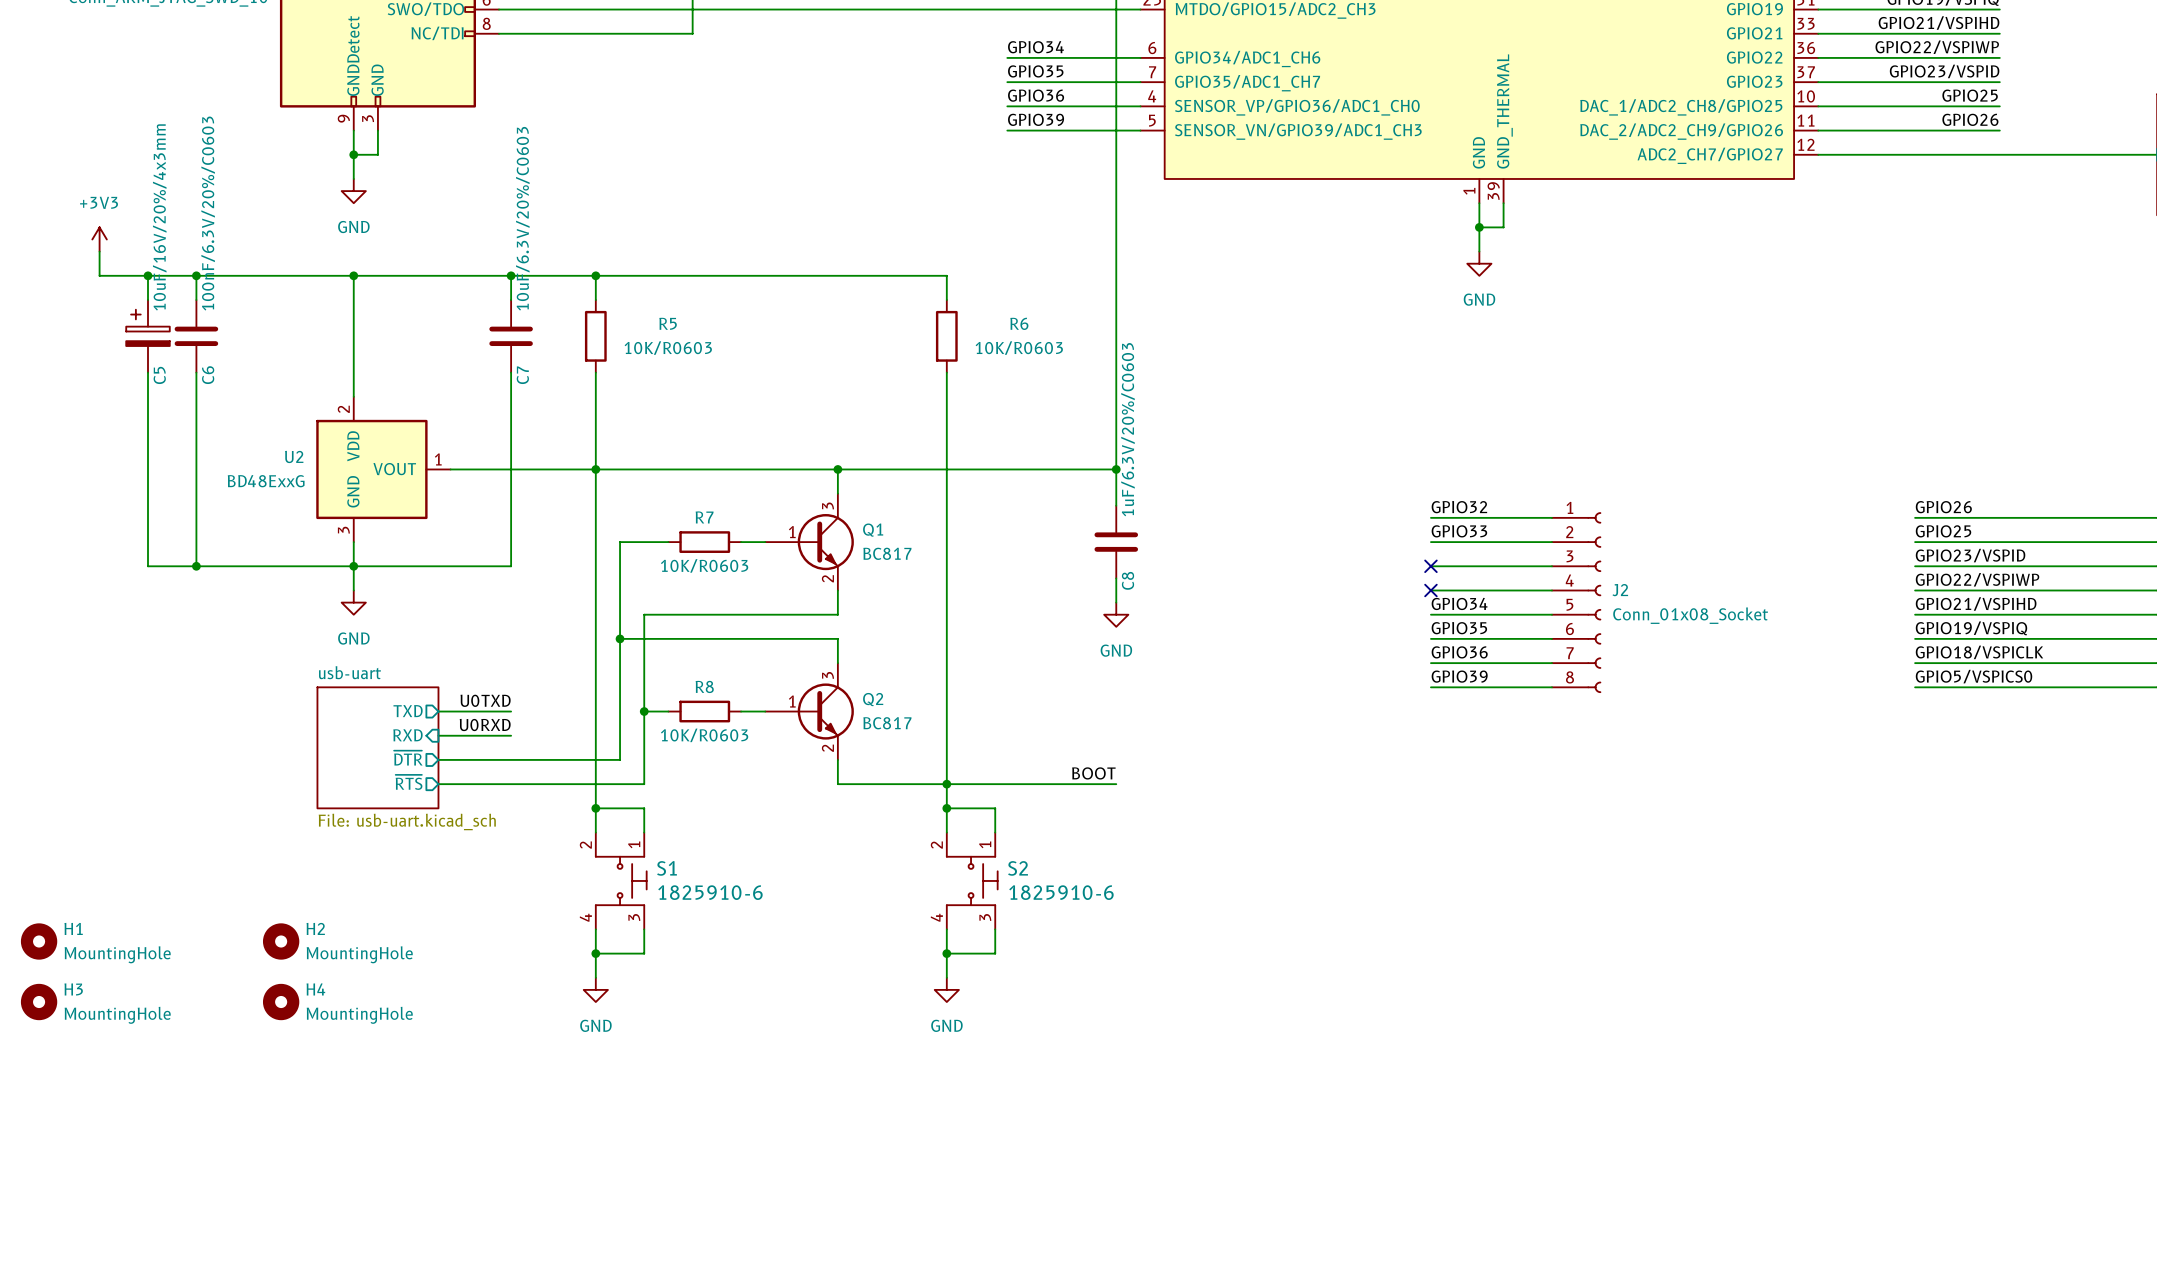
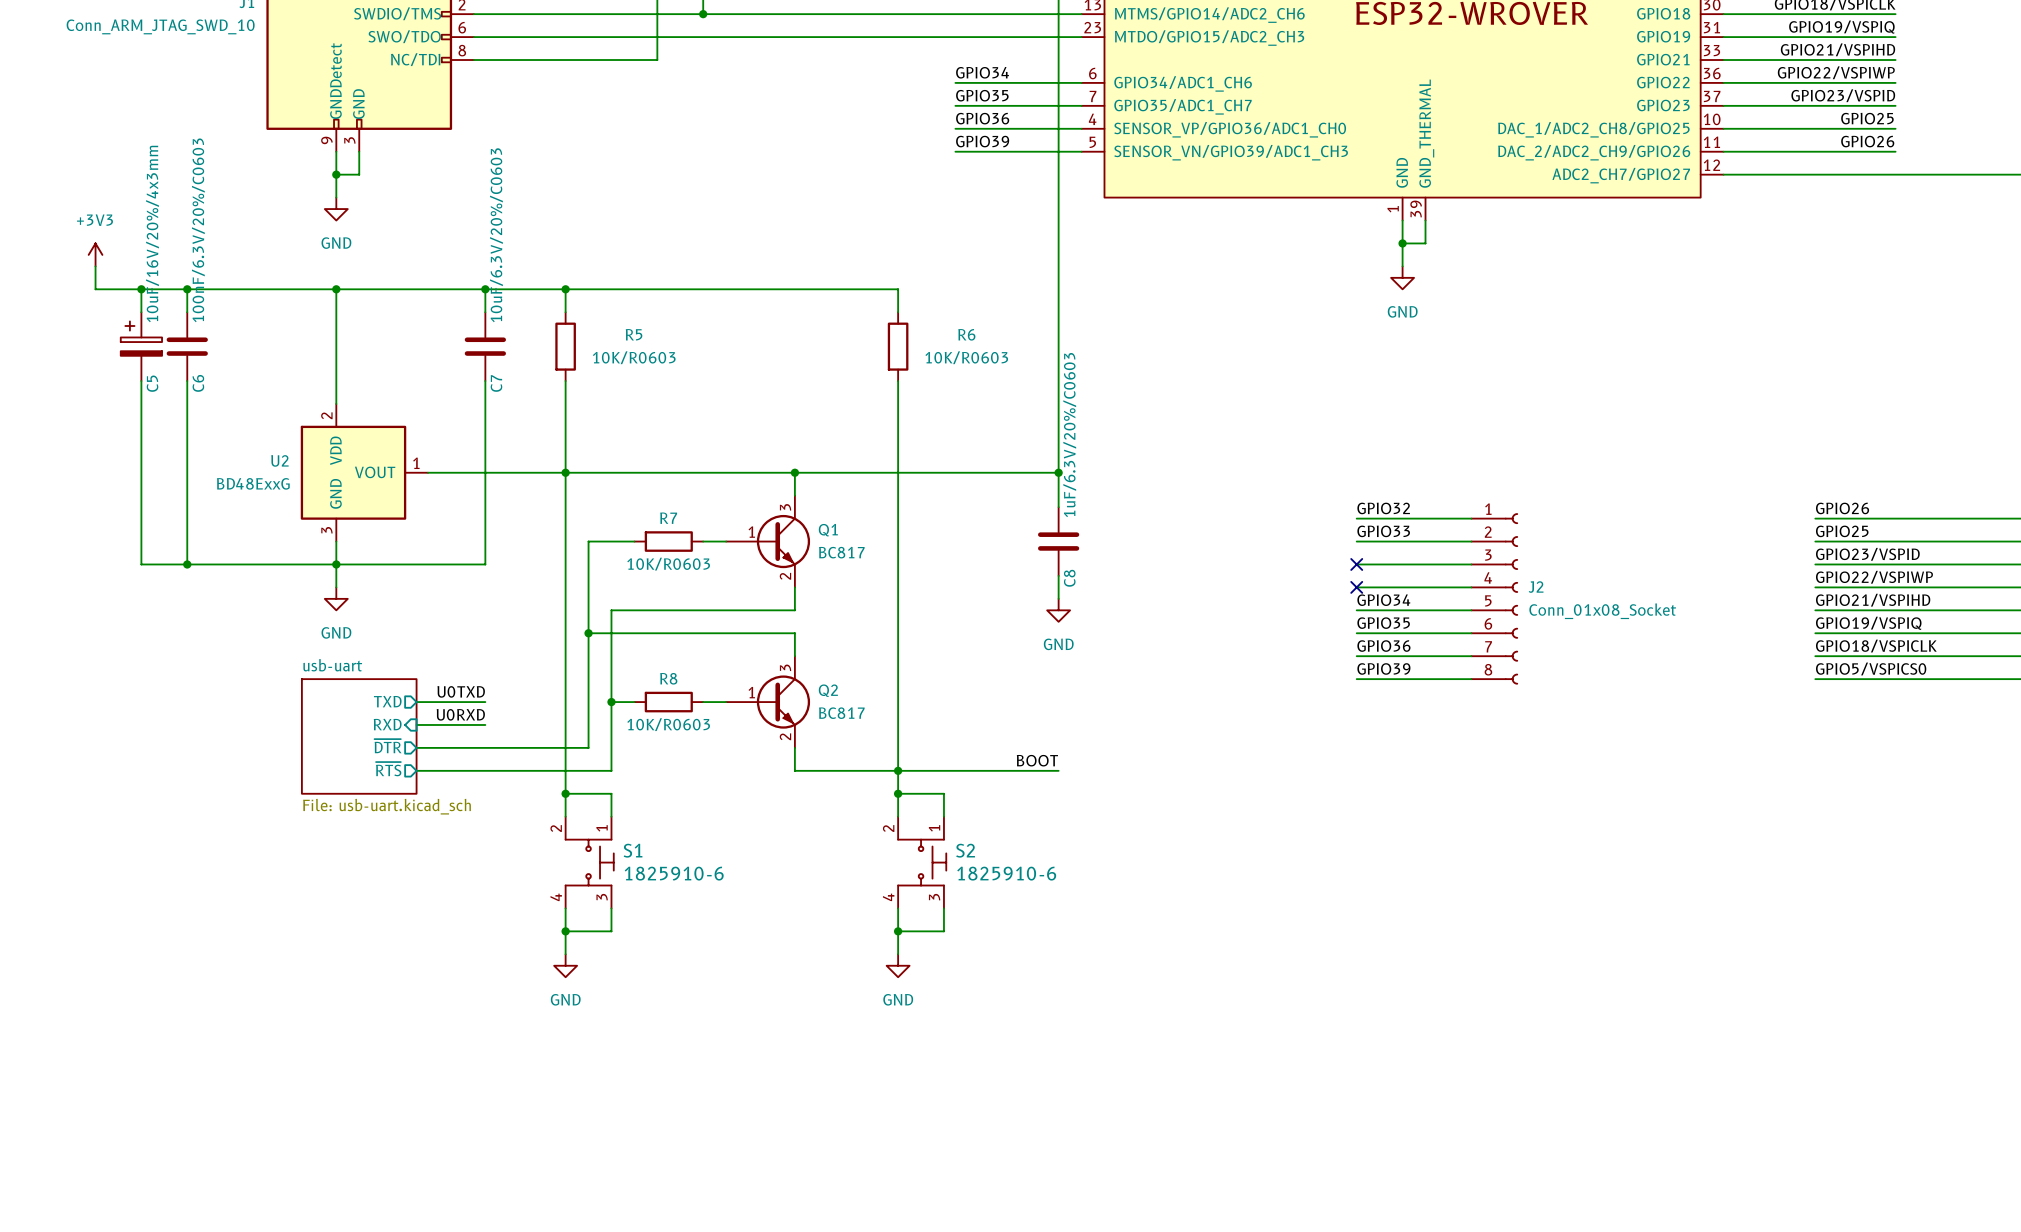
H1: MountingHole (39, 941) -> none
H2: MountingHole (281, 941) -> none
H3: MountingHole (39, 1002) -> none
H4: MountingHole (281, 1002) -> none

